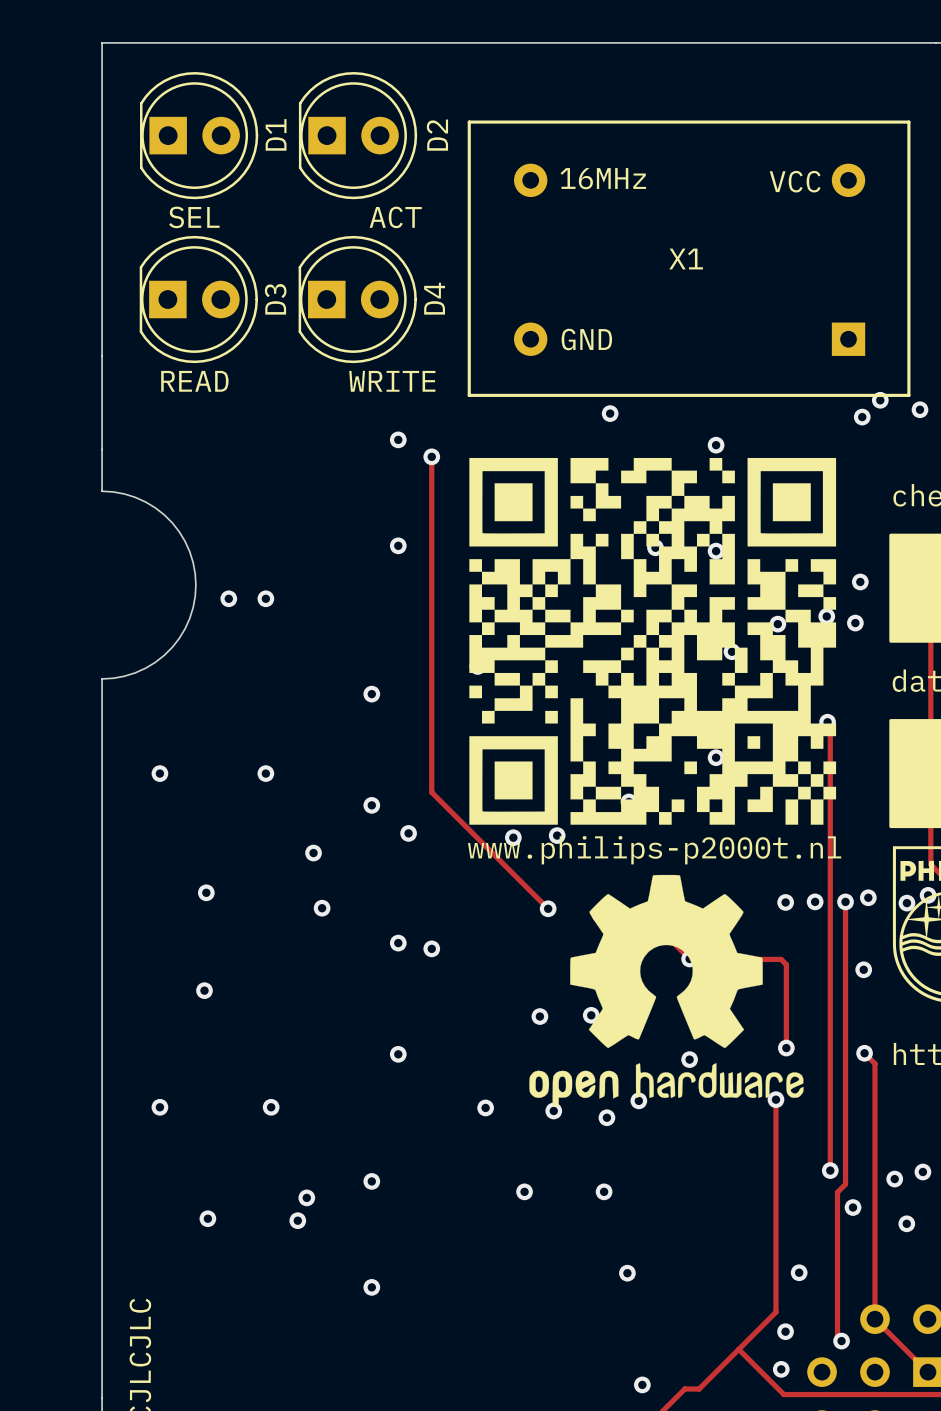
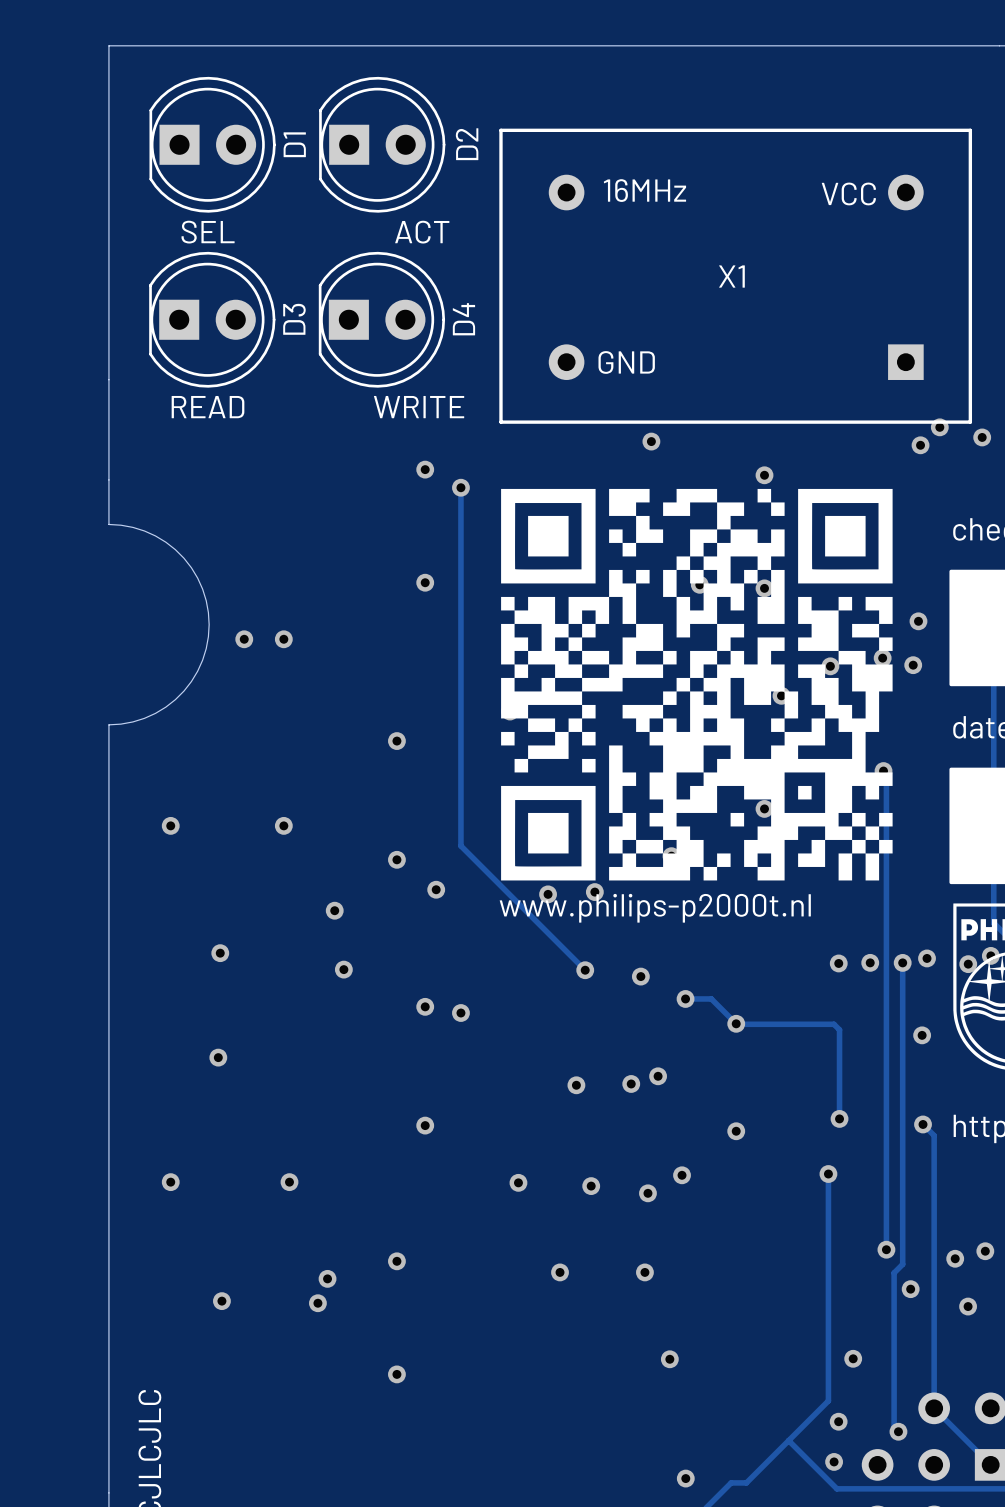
drawing: [529, 874, 804, 1108] -> none

